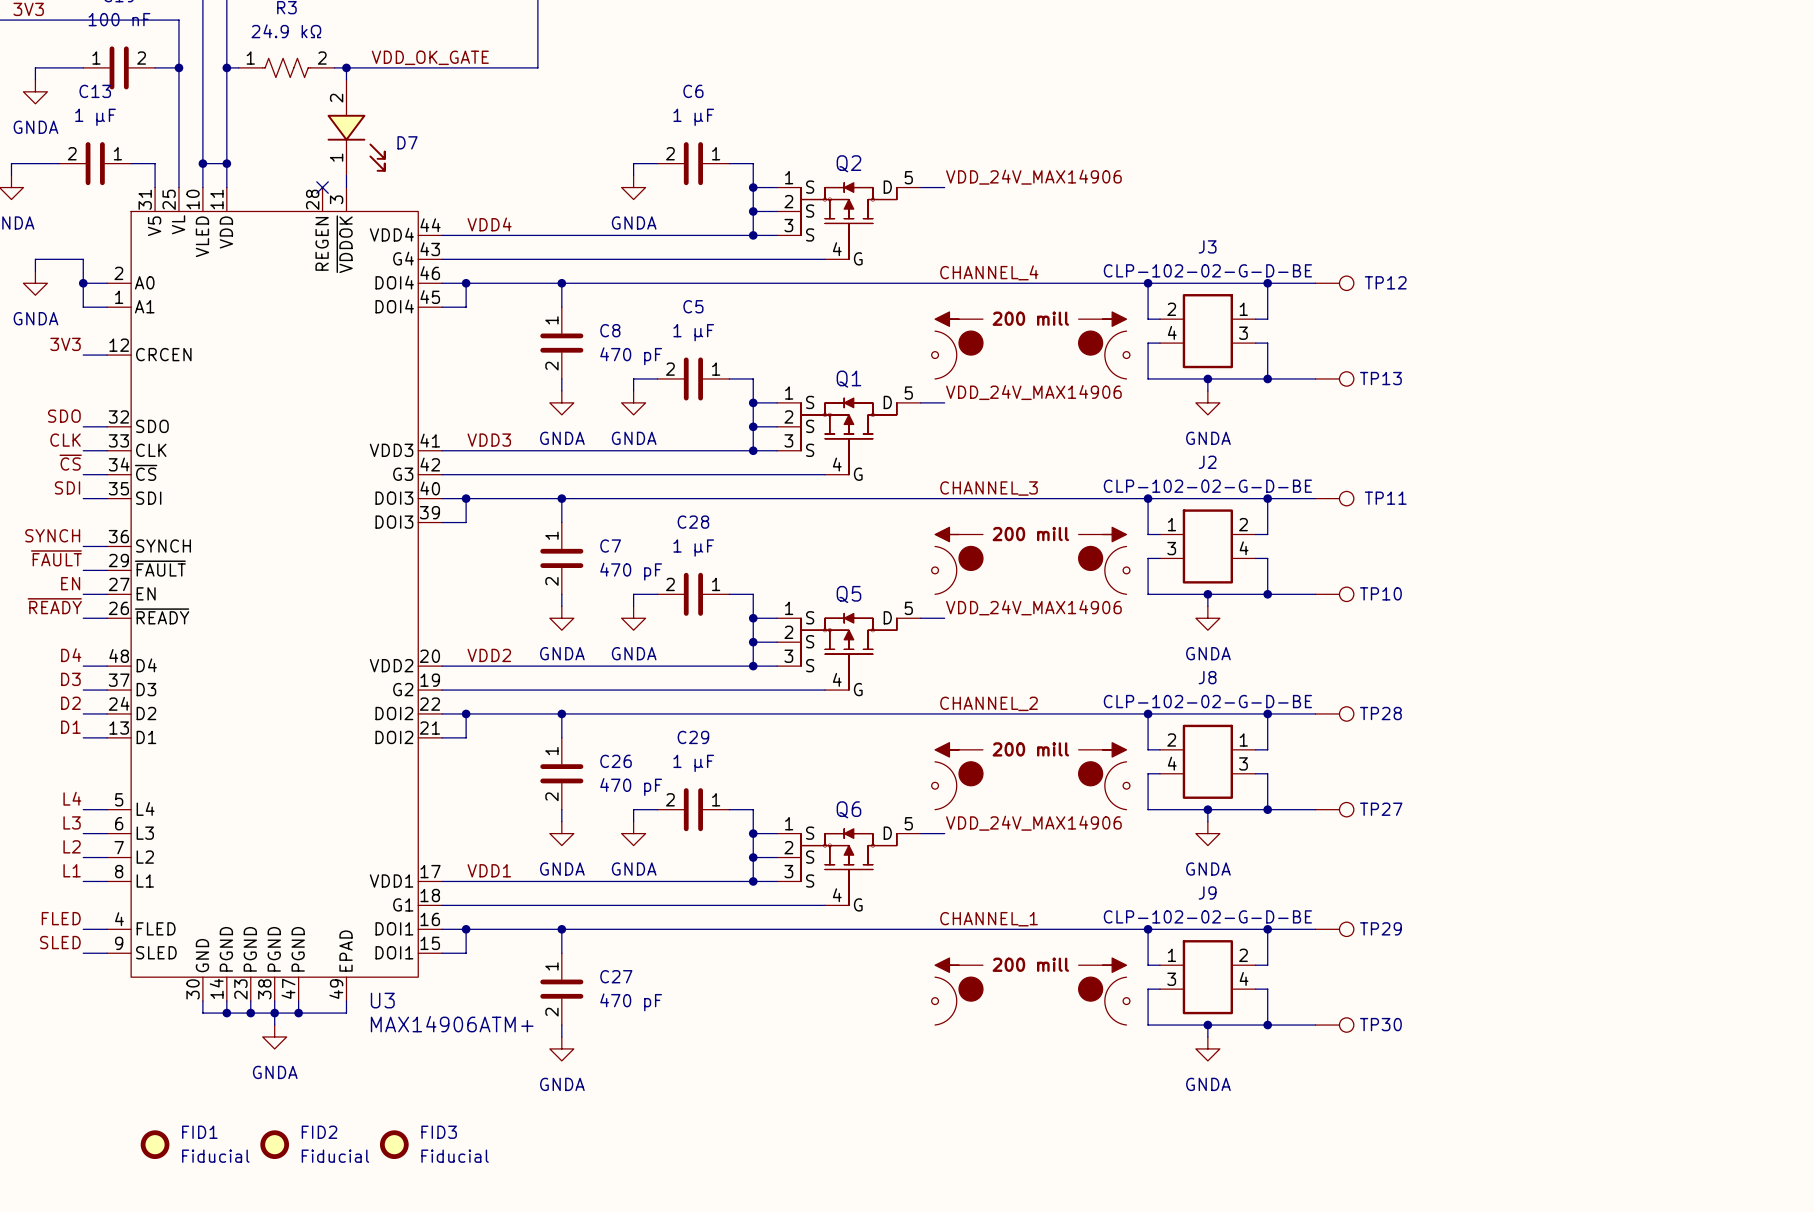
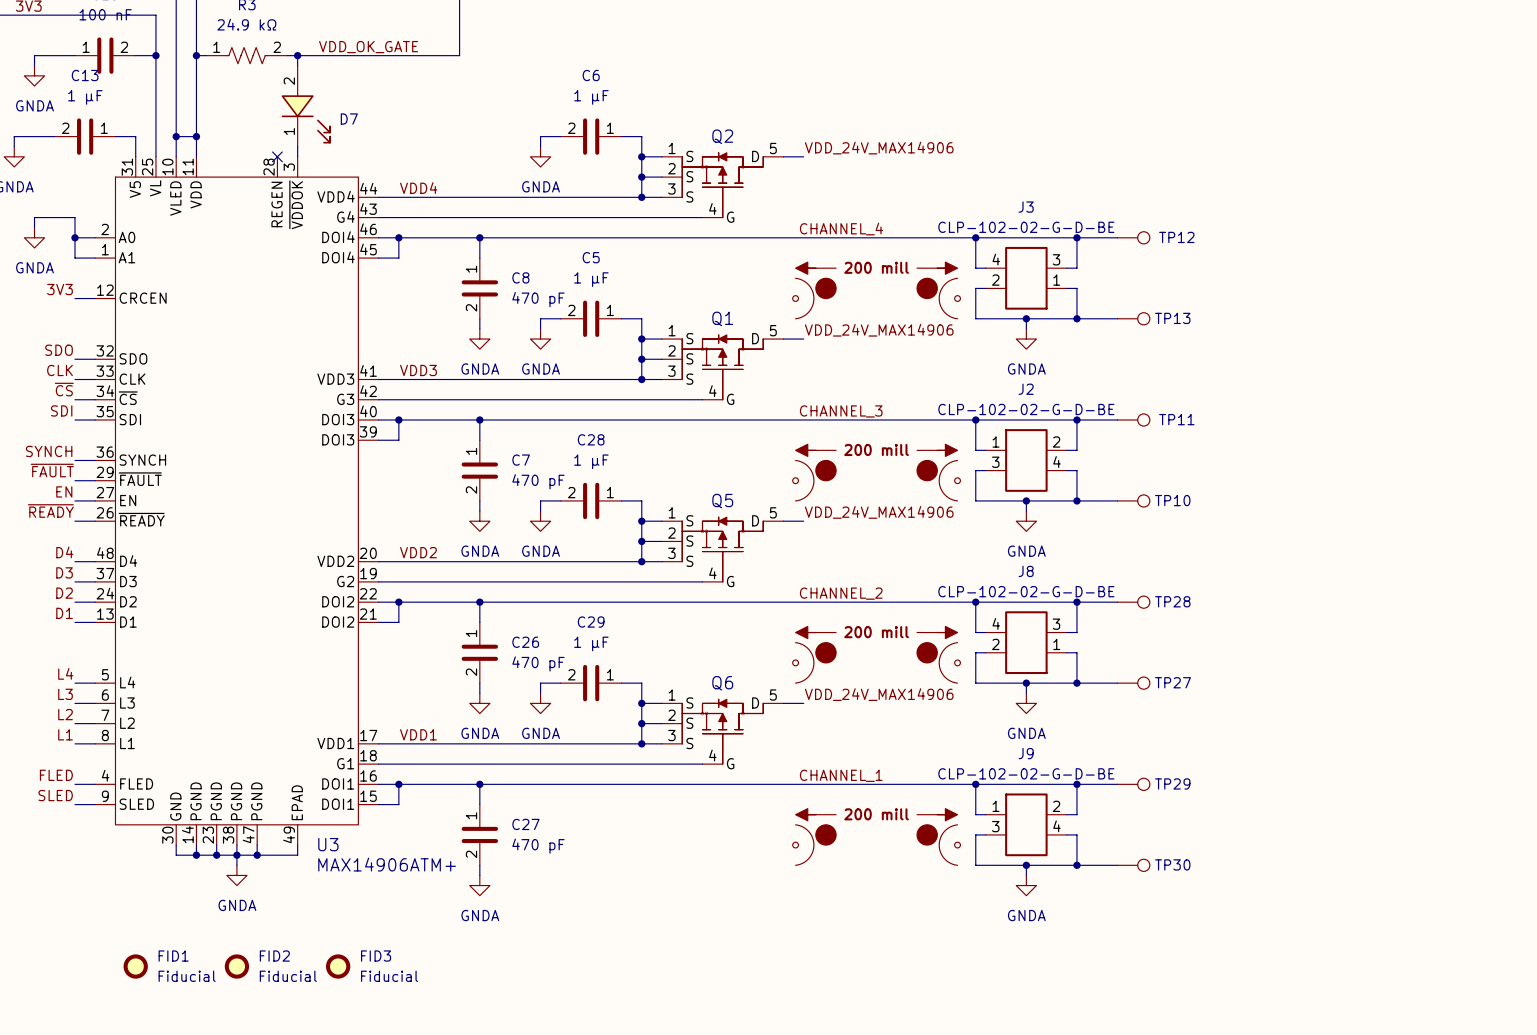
J3 flip: as is (1207, 331) -> up-down (1026, 278)
J8 flip: as is (1207, 761) -> up-down (1026, 642)

